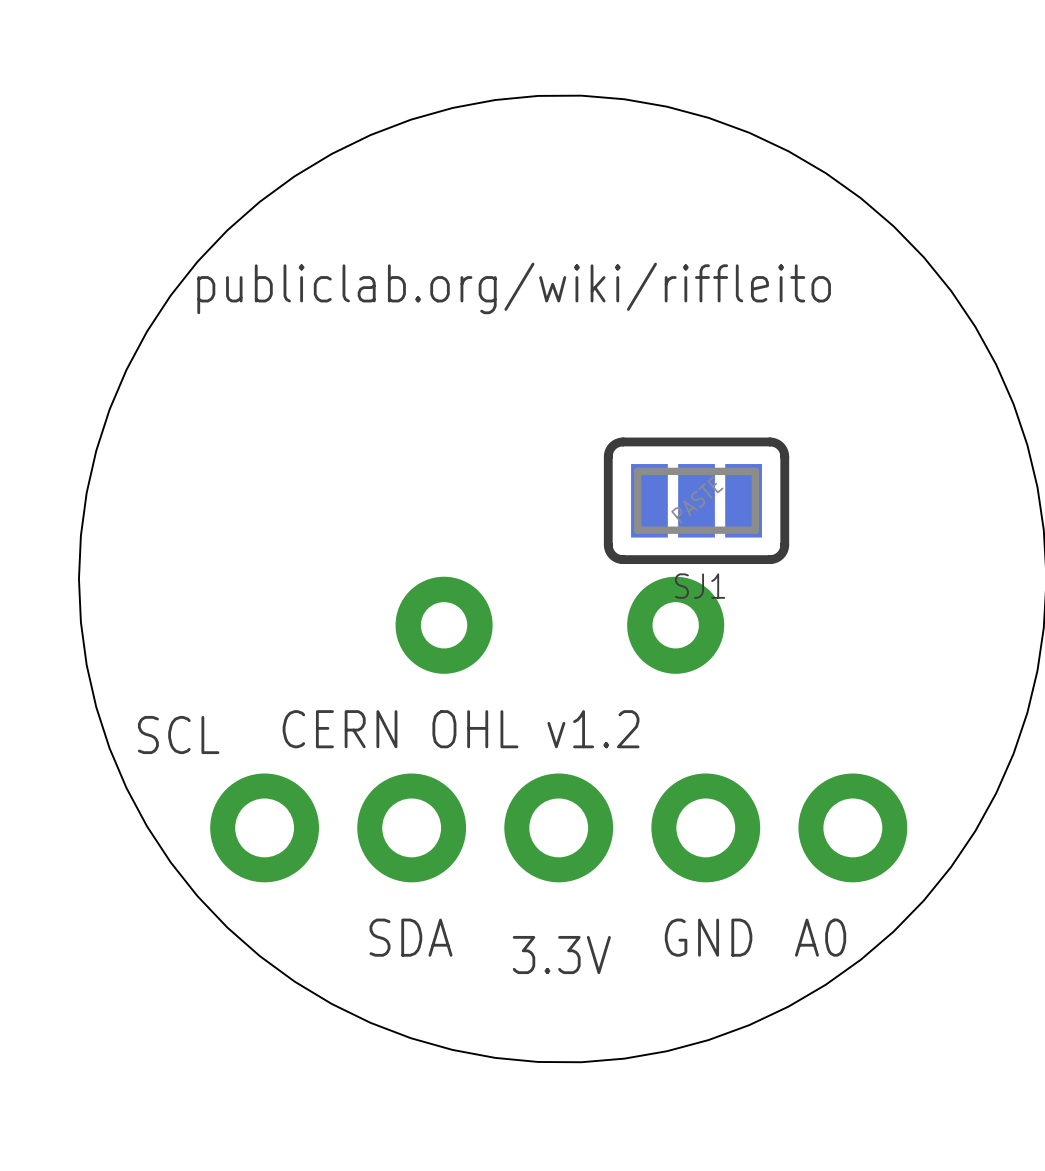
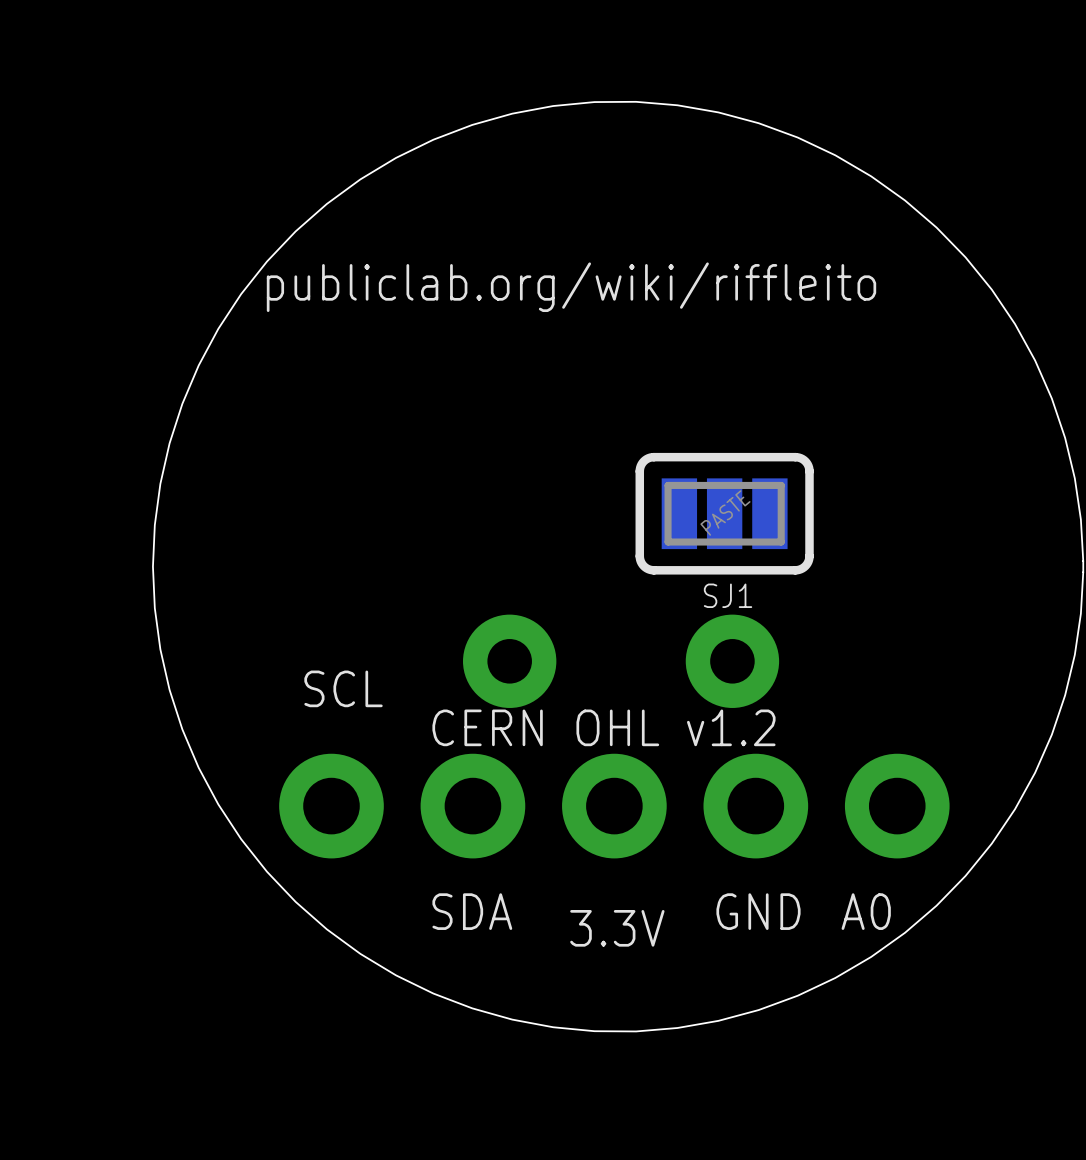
SJ1 position: (696, 500) -> (724, 513)
part position: (559, 625) -> (621, 661)
text position: CERN OHL v1.2 (461, 729) -> CERN OHL v1.2 (603, 727)
text position: SCL (178, 735) -> SCL (343, 688)

